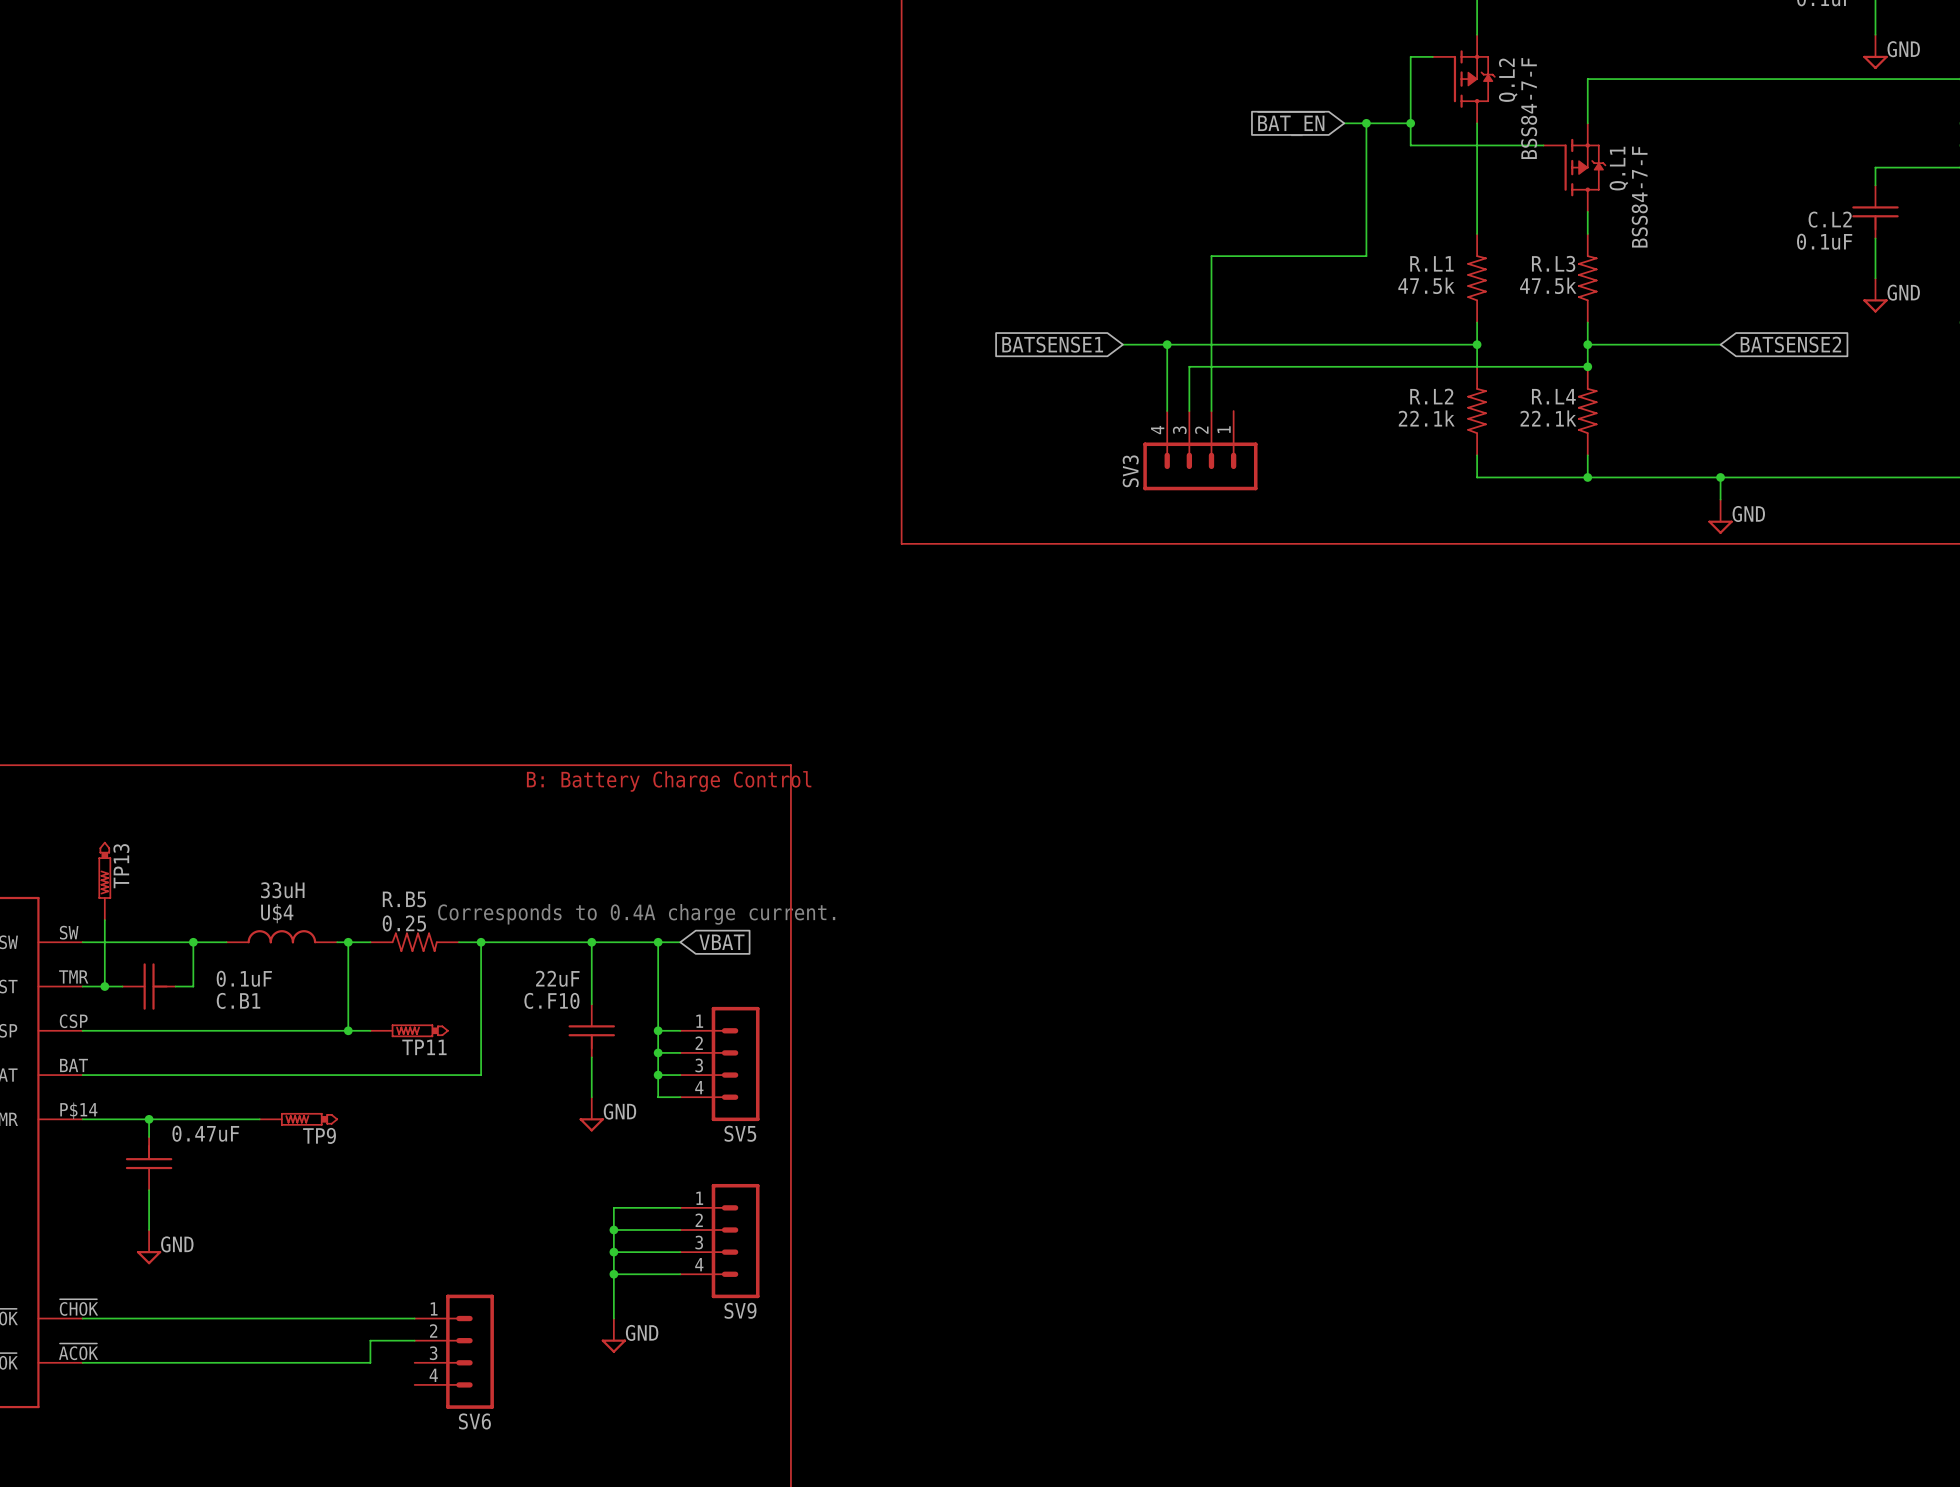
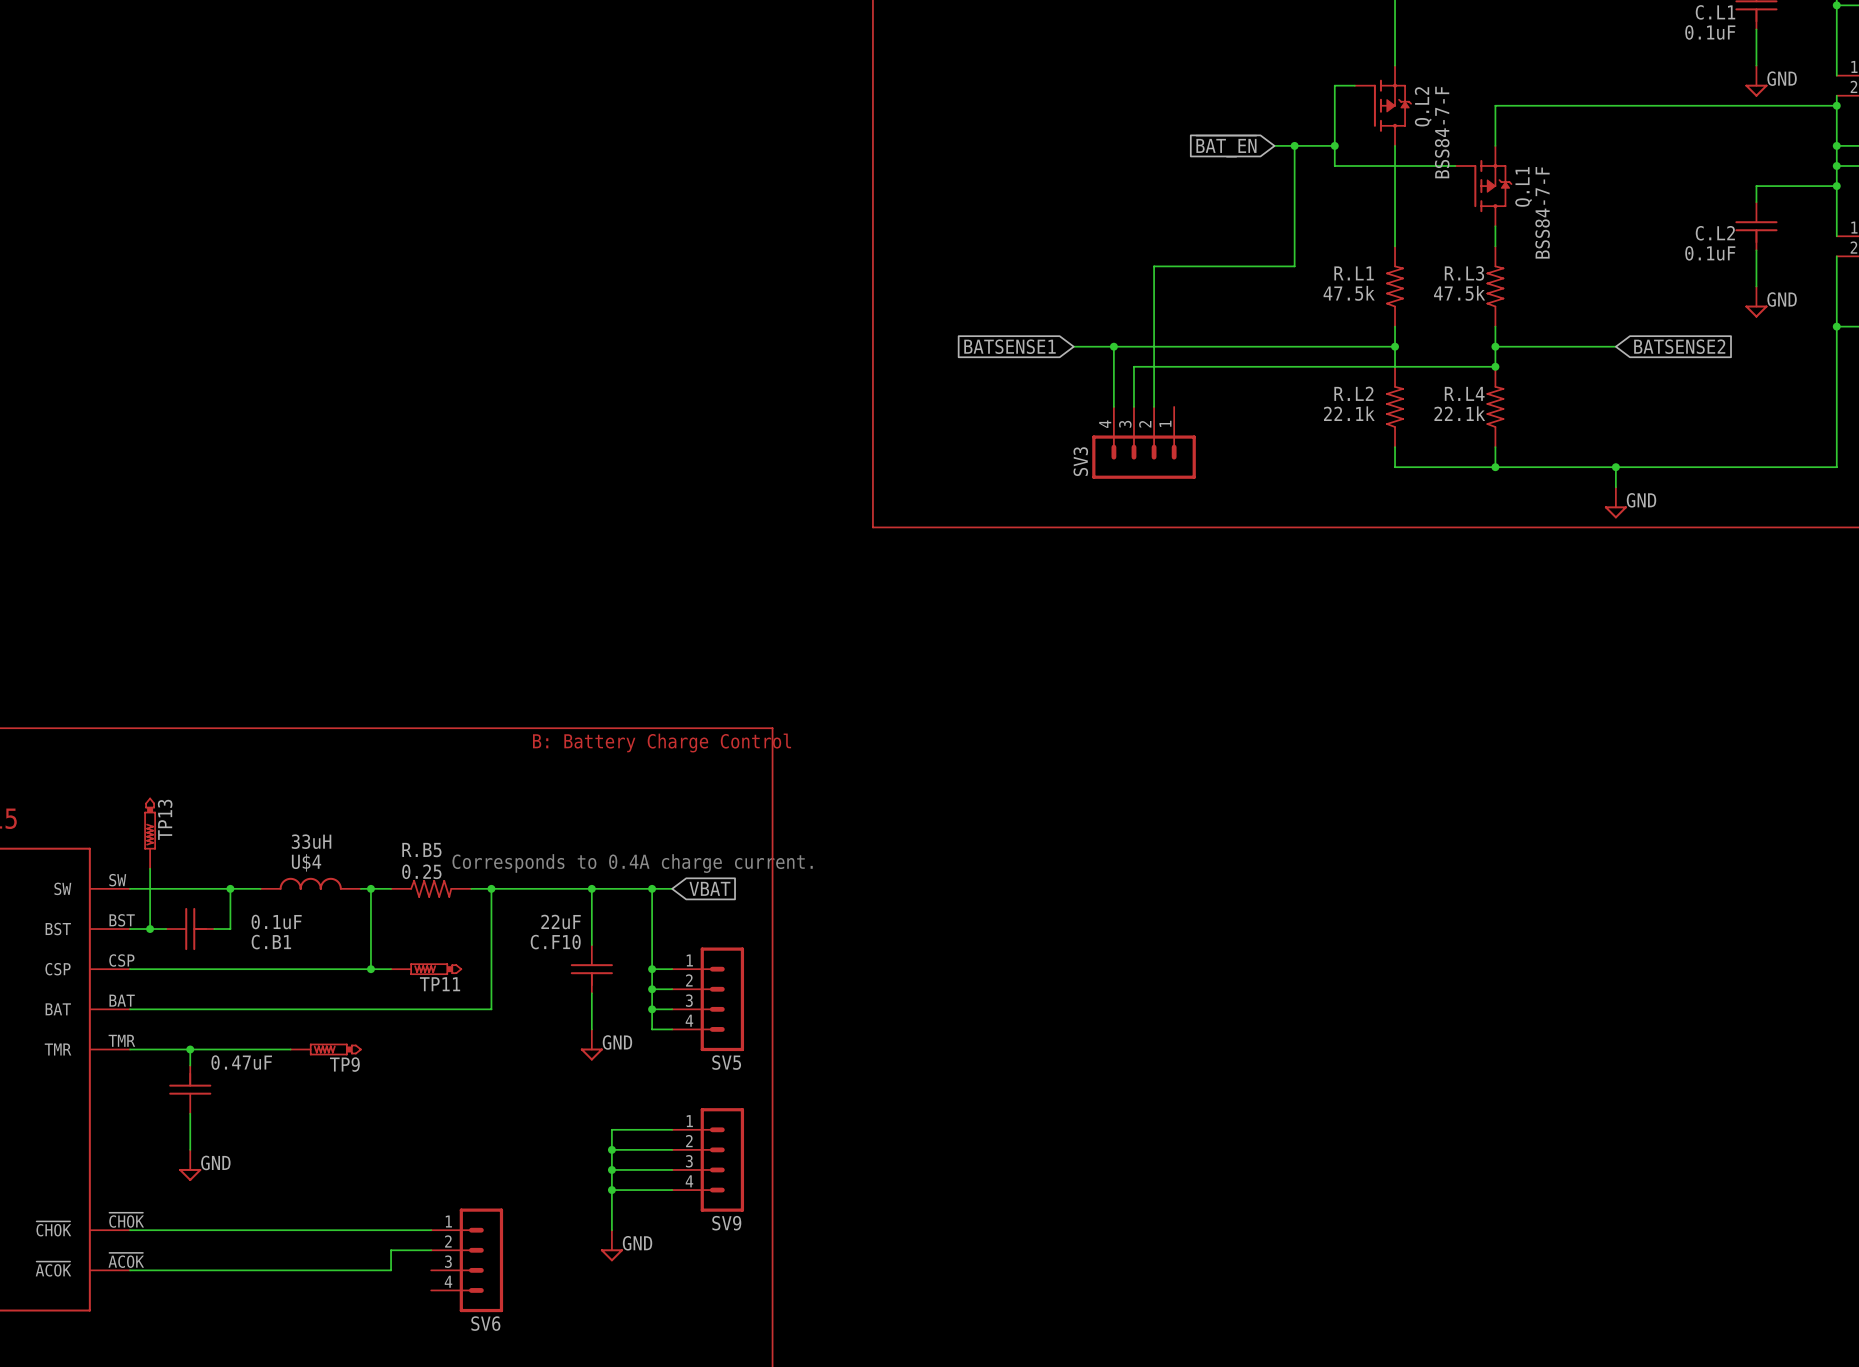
part pin number: TMR (73, 976) -> BST (122, 920)
part pin number: P$14 (78, 1110) -> TMR (121, 1040)

